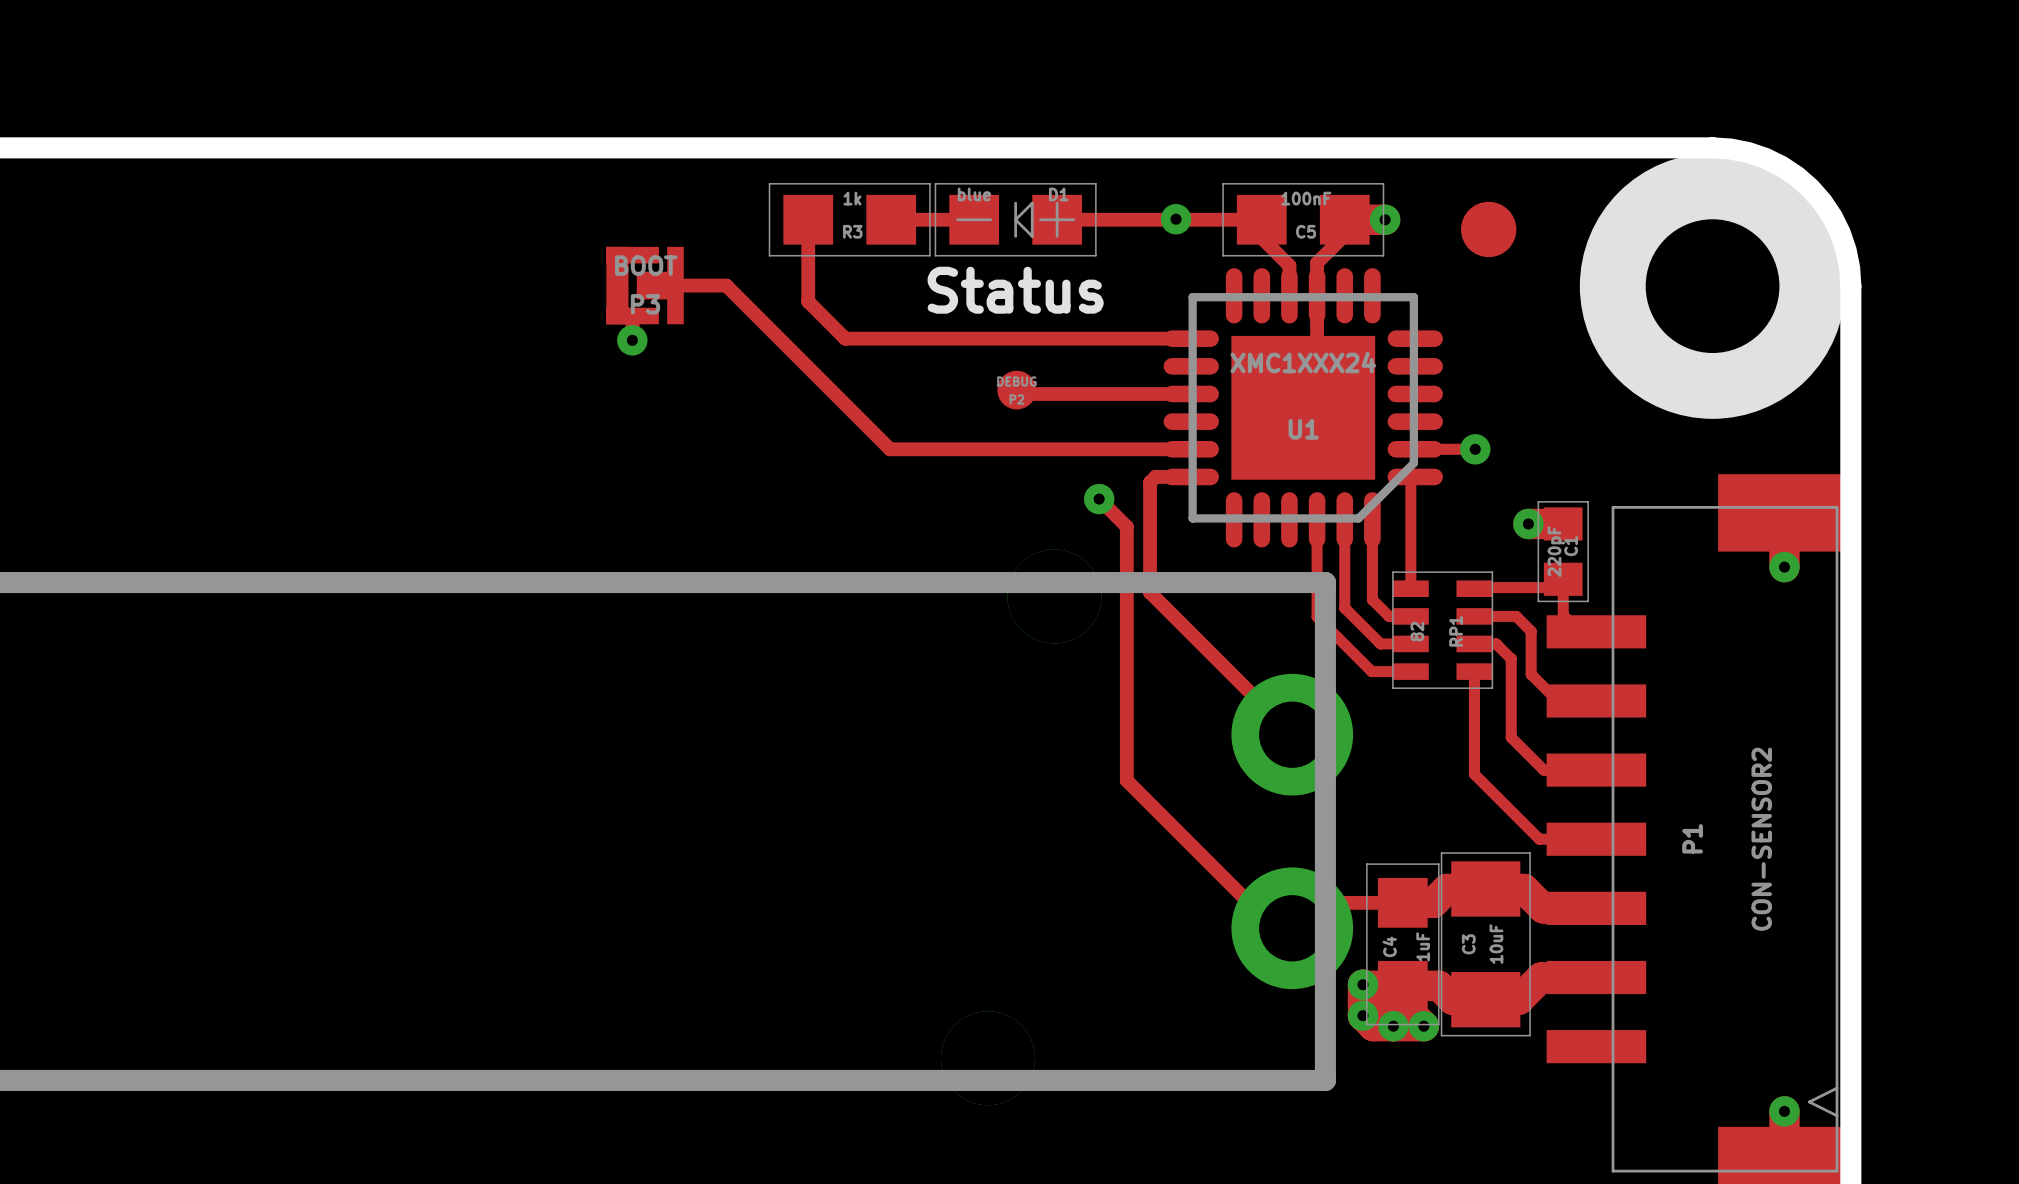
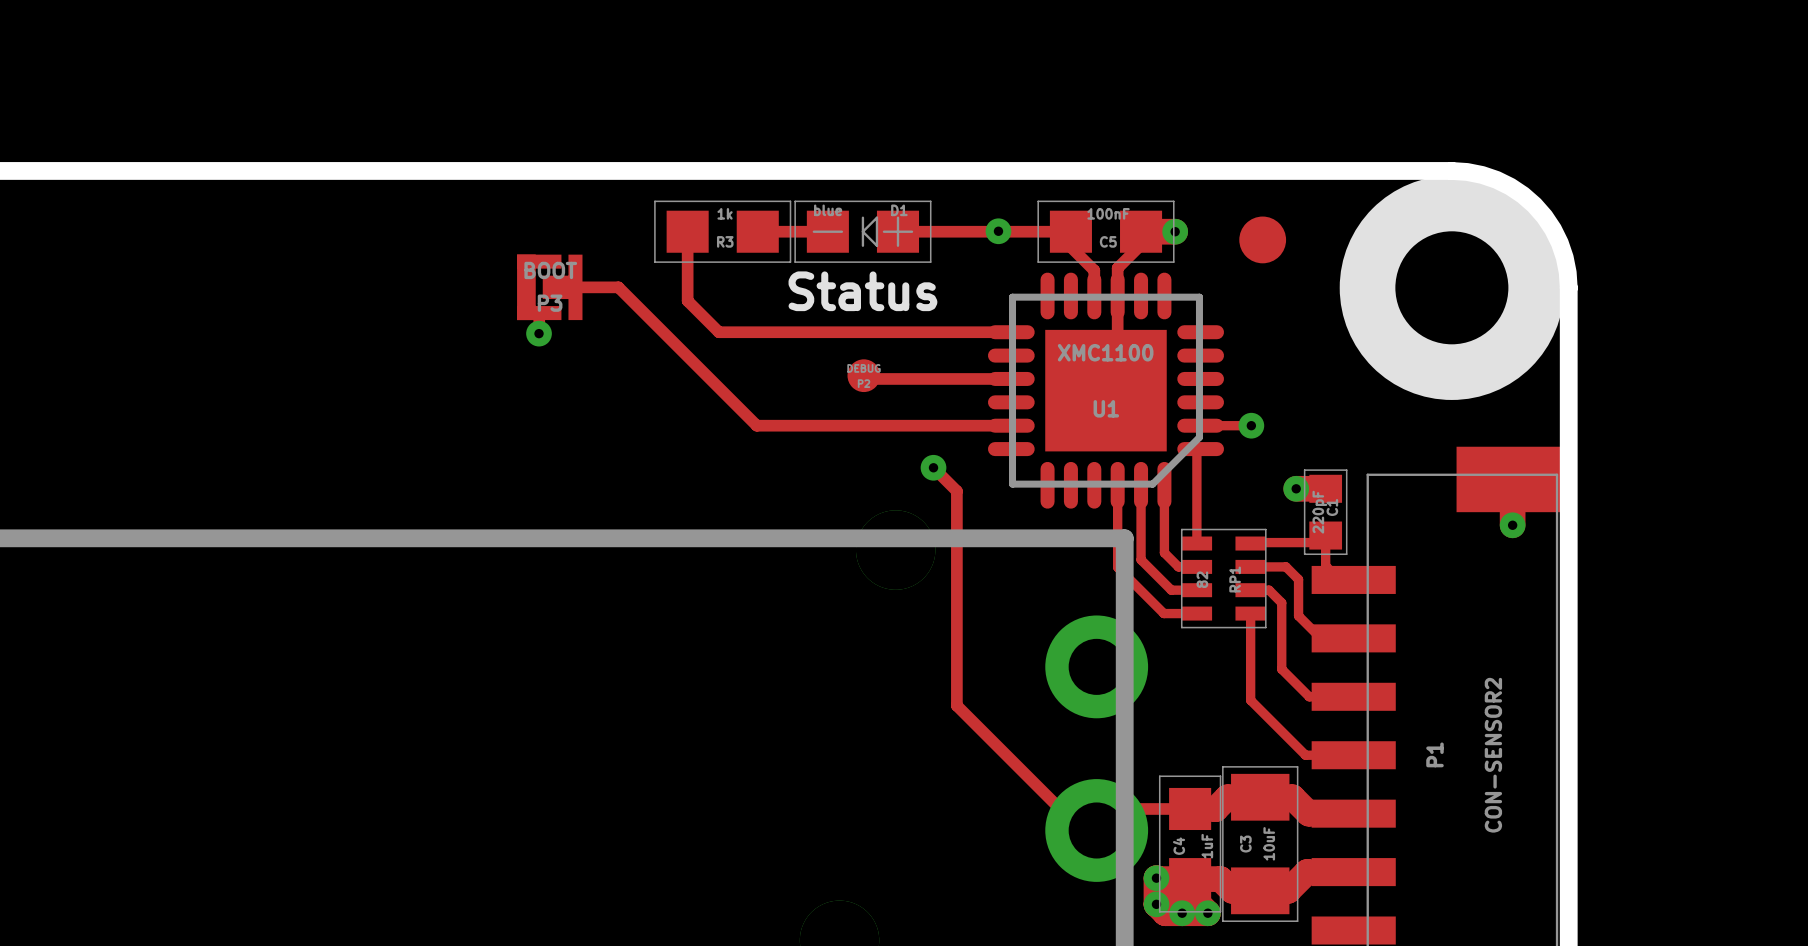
U1 value: XMC1XXX24 (1303, 362) -> XMC1100 (1105, 352)
track: (1191, 476) (1155, 476) (1150, 482) (1150, 592) (1292, 734) -> none

